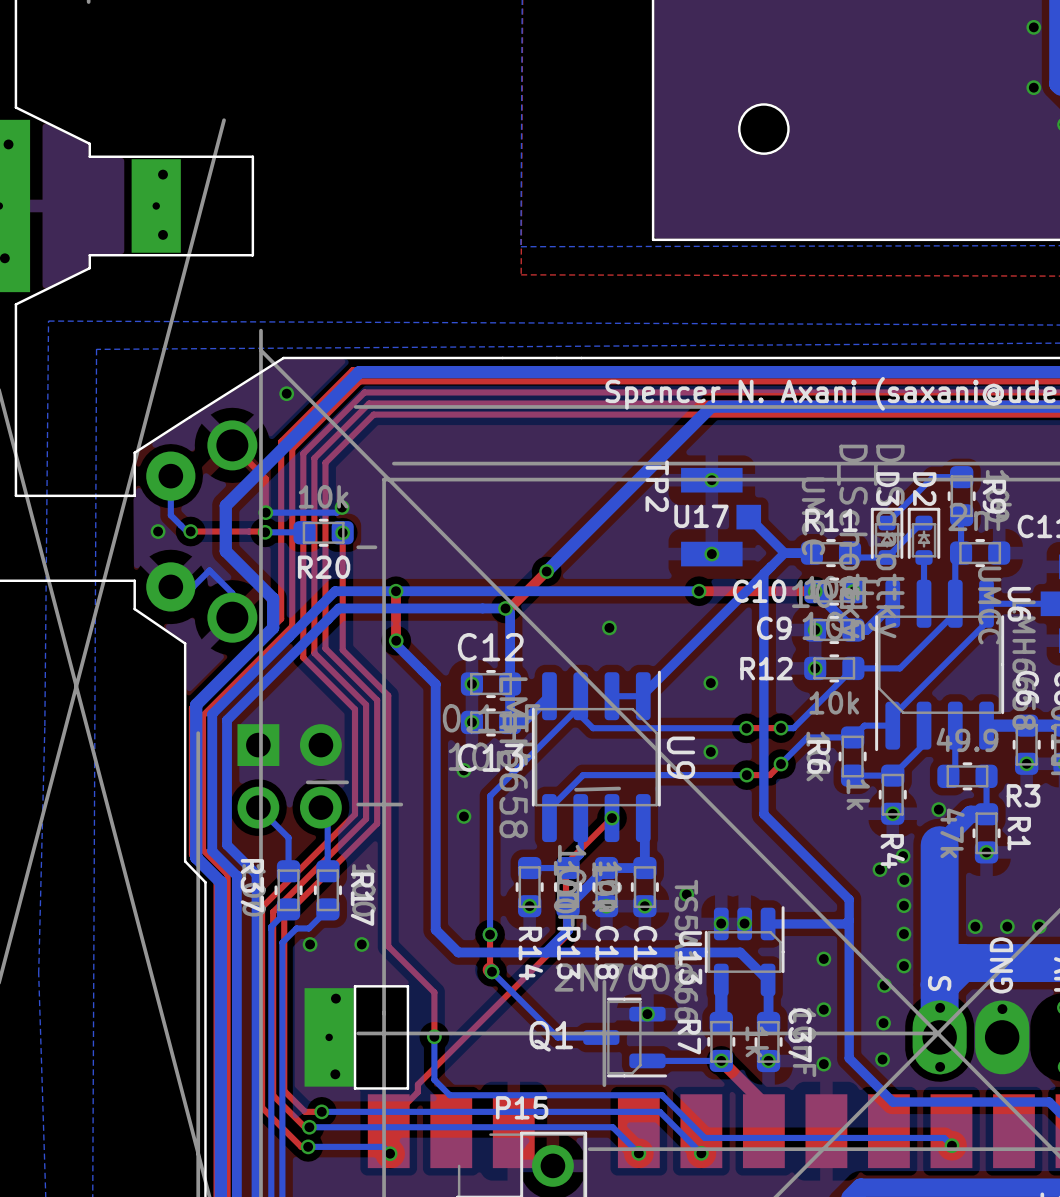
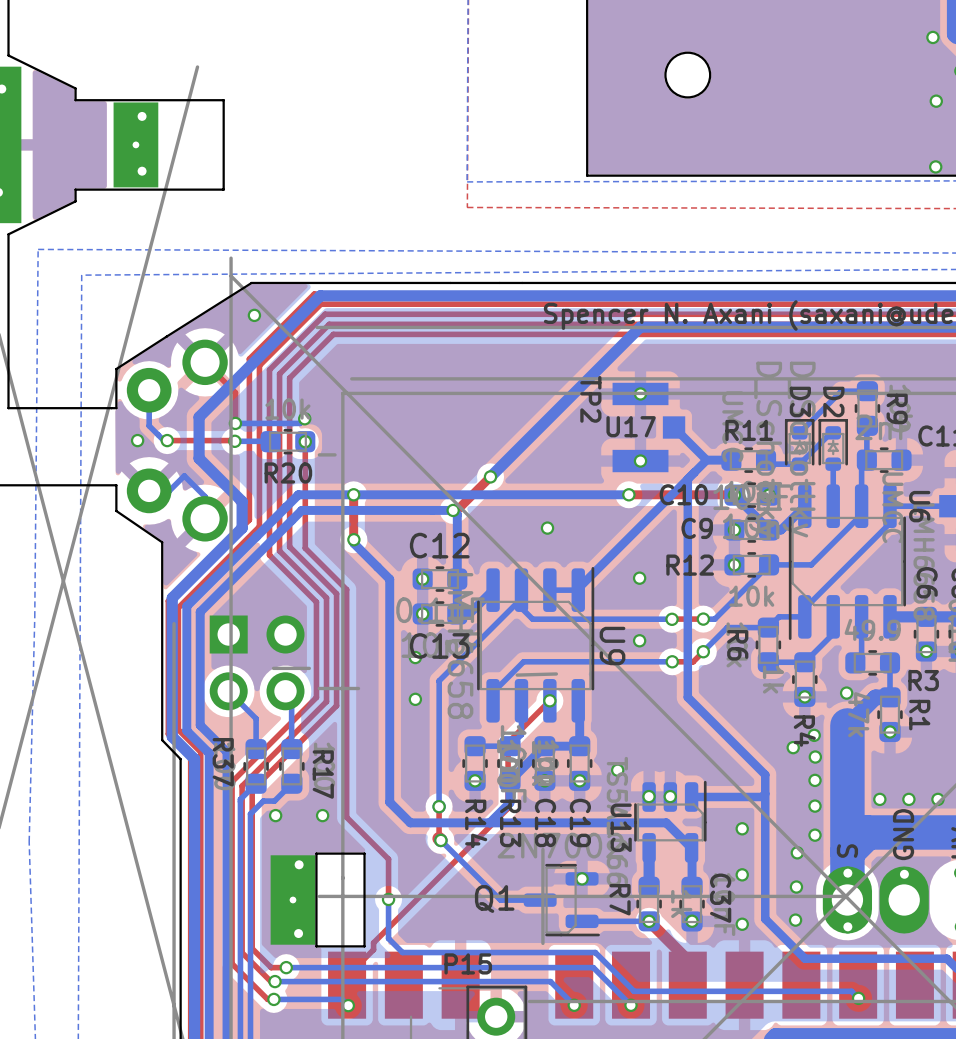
via: none -> (936, 101)
via: none -> (935, 166)

